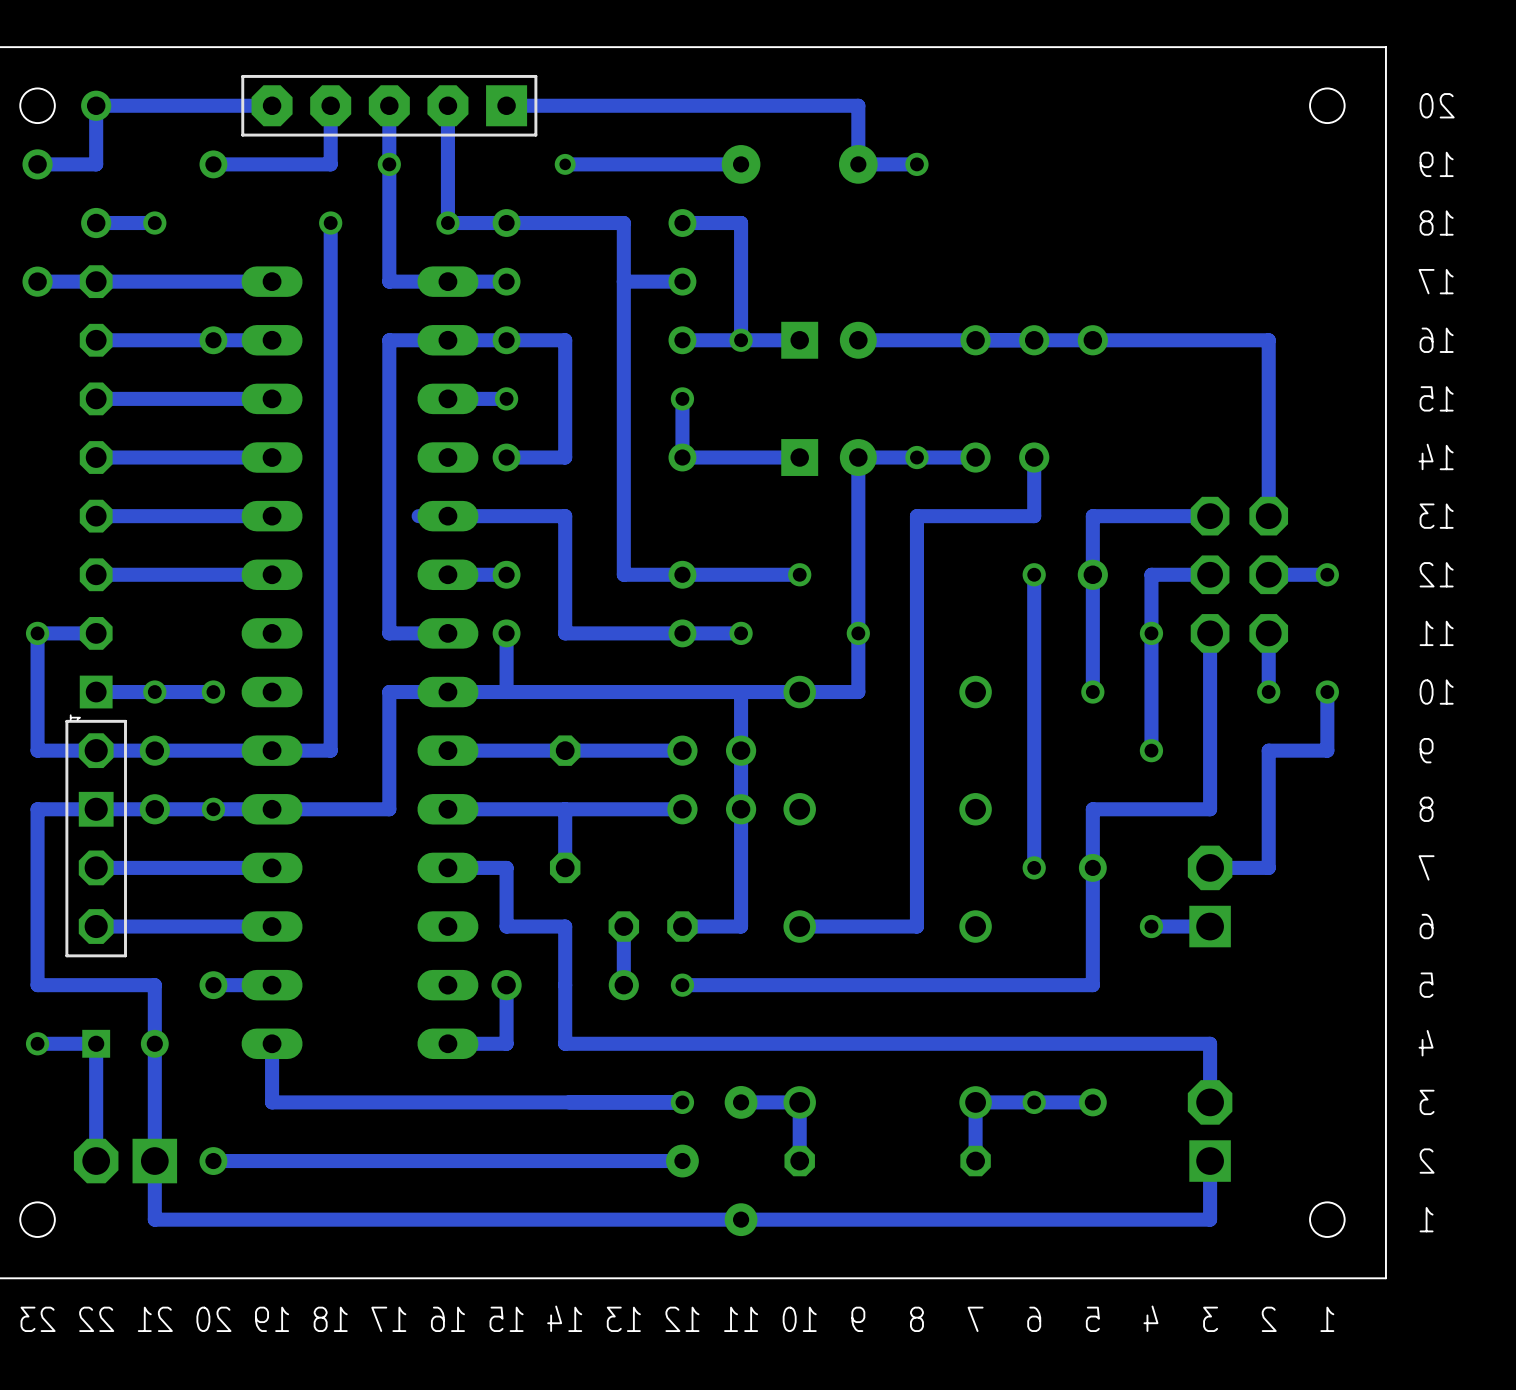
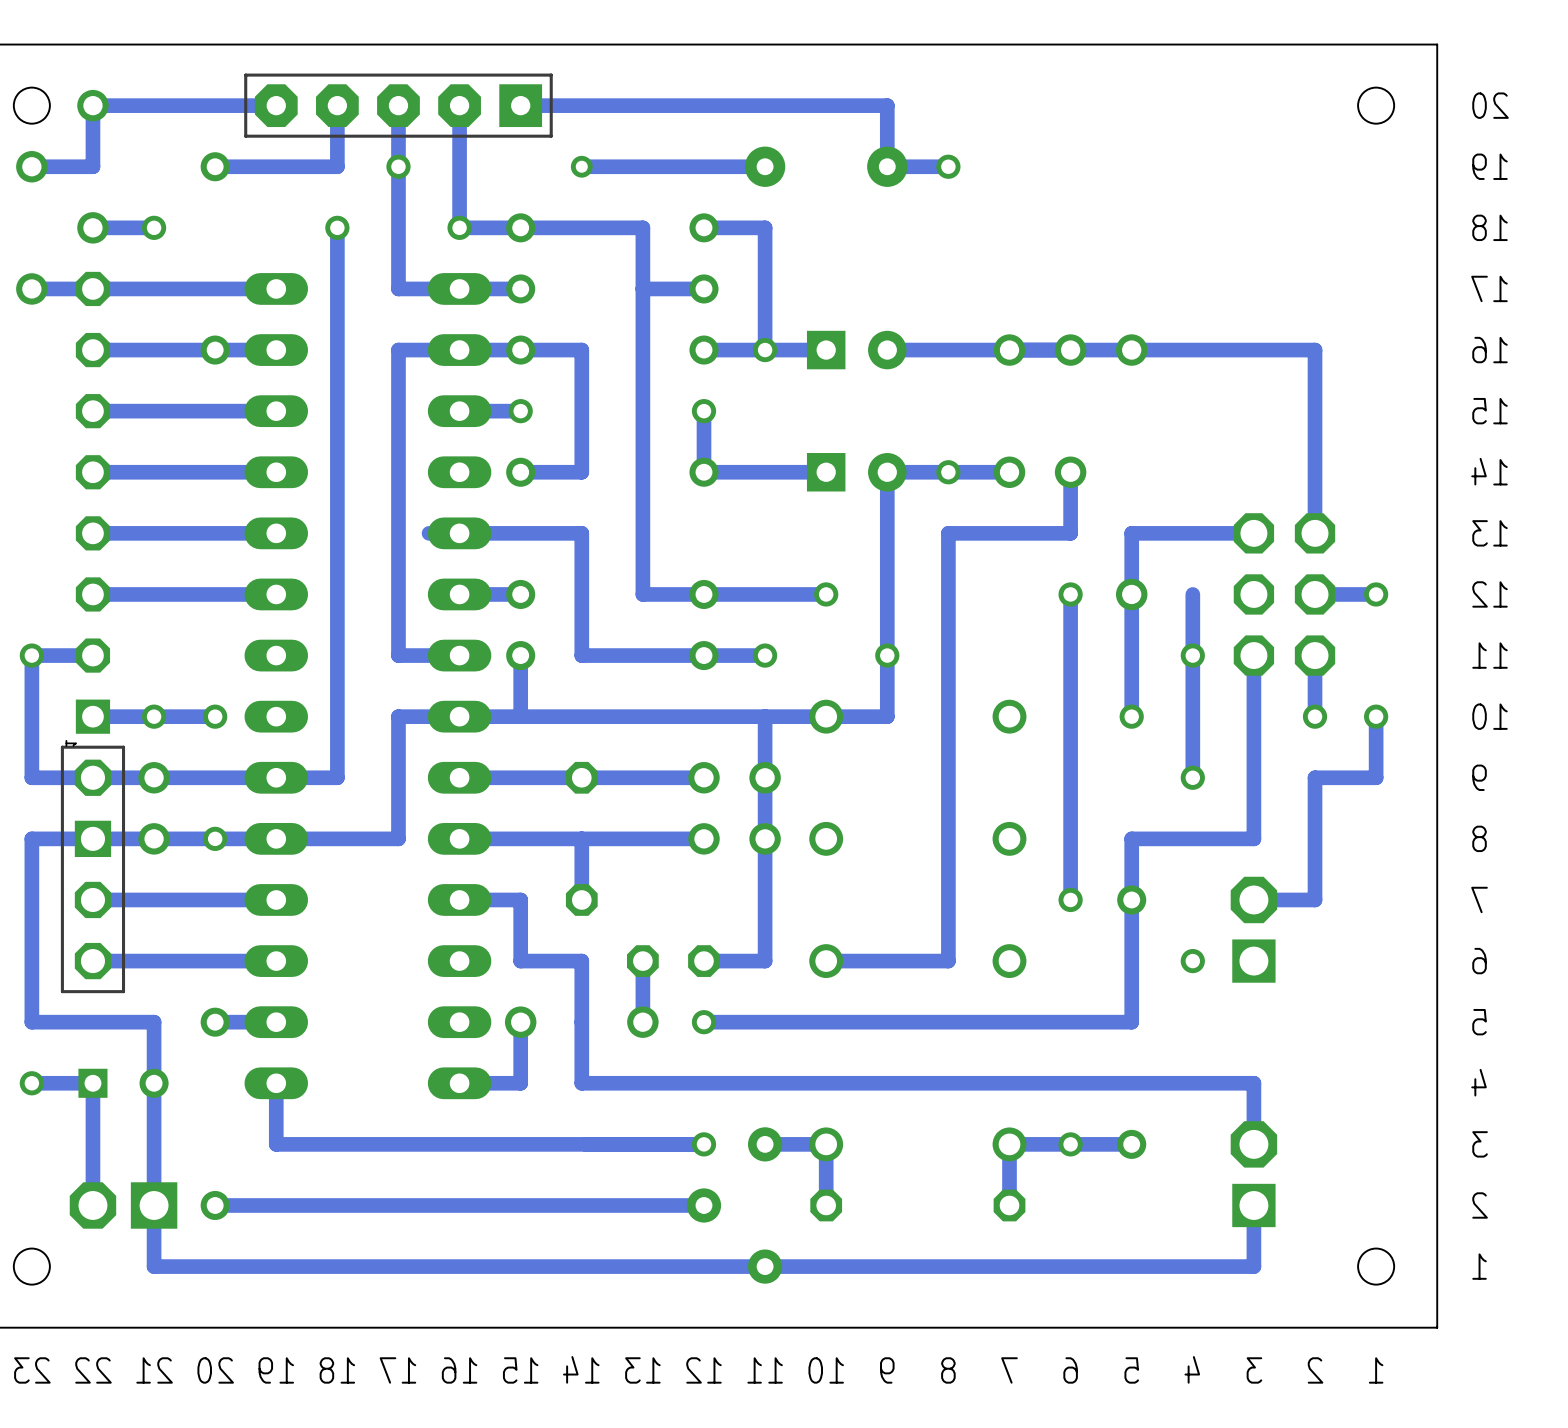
track: (1210, 574) (1151, 574) -> none
track: (1210, 926) (1151, 926) -> none

